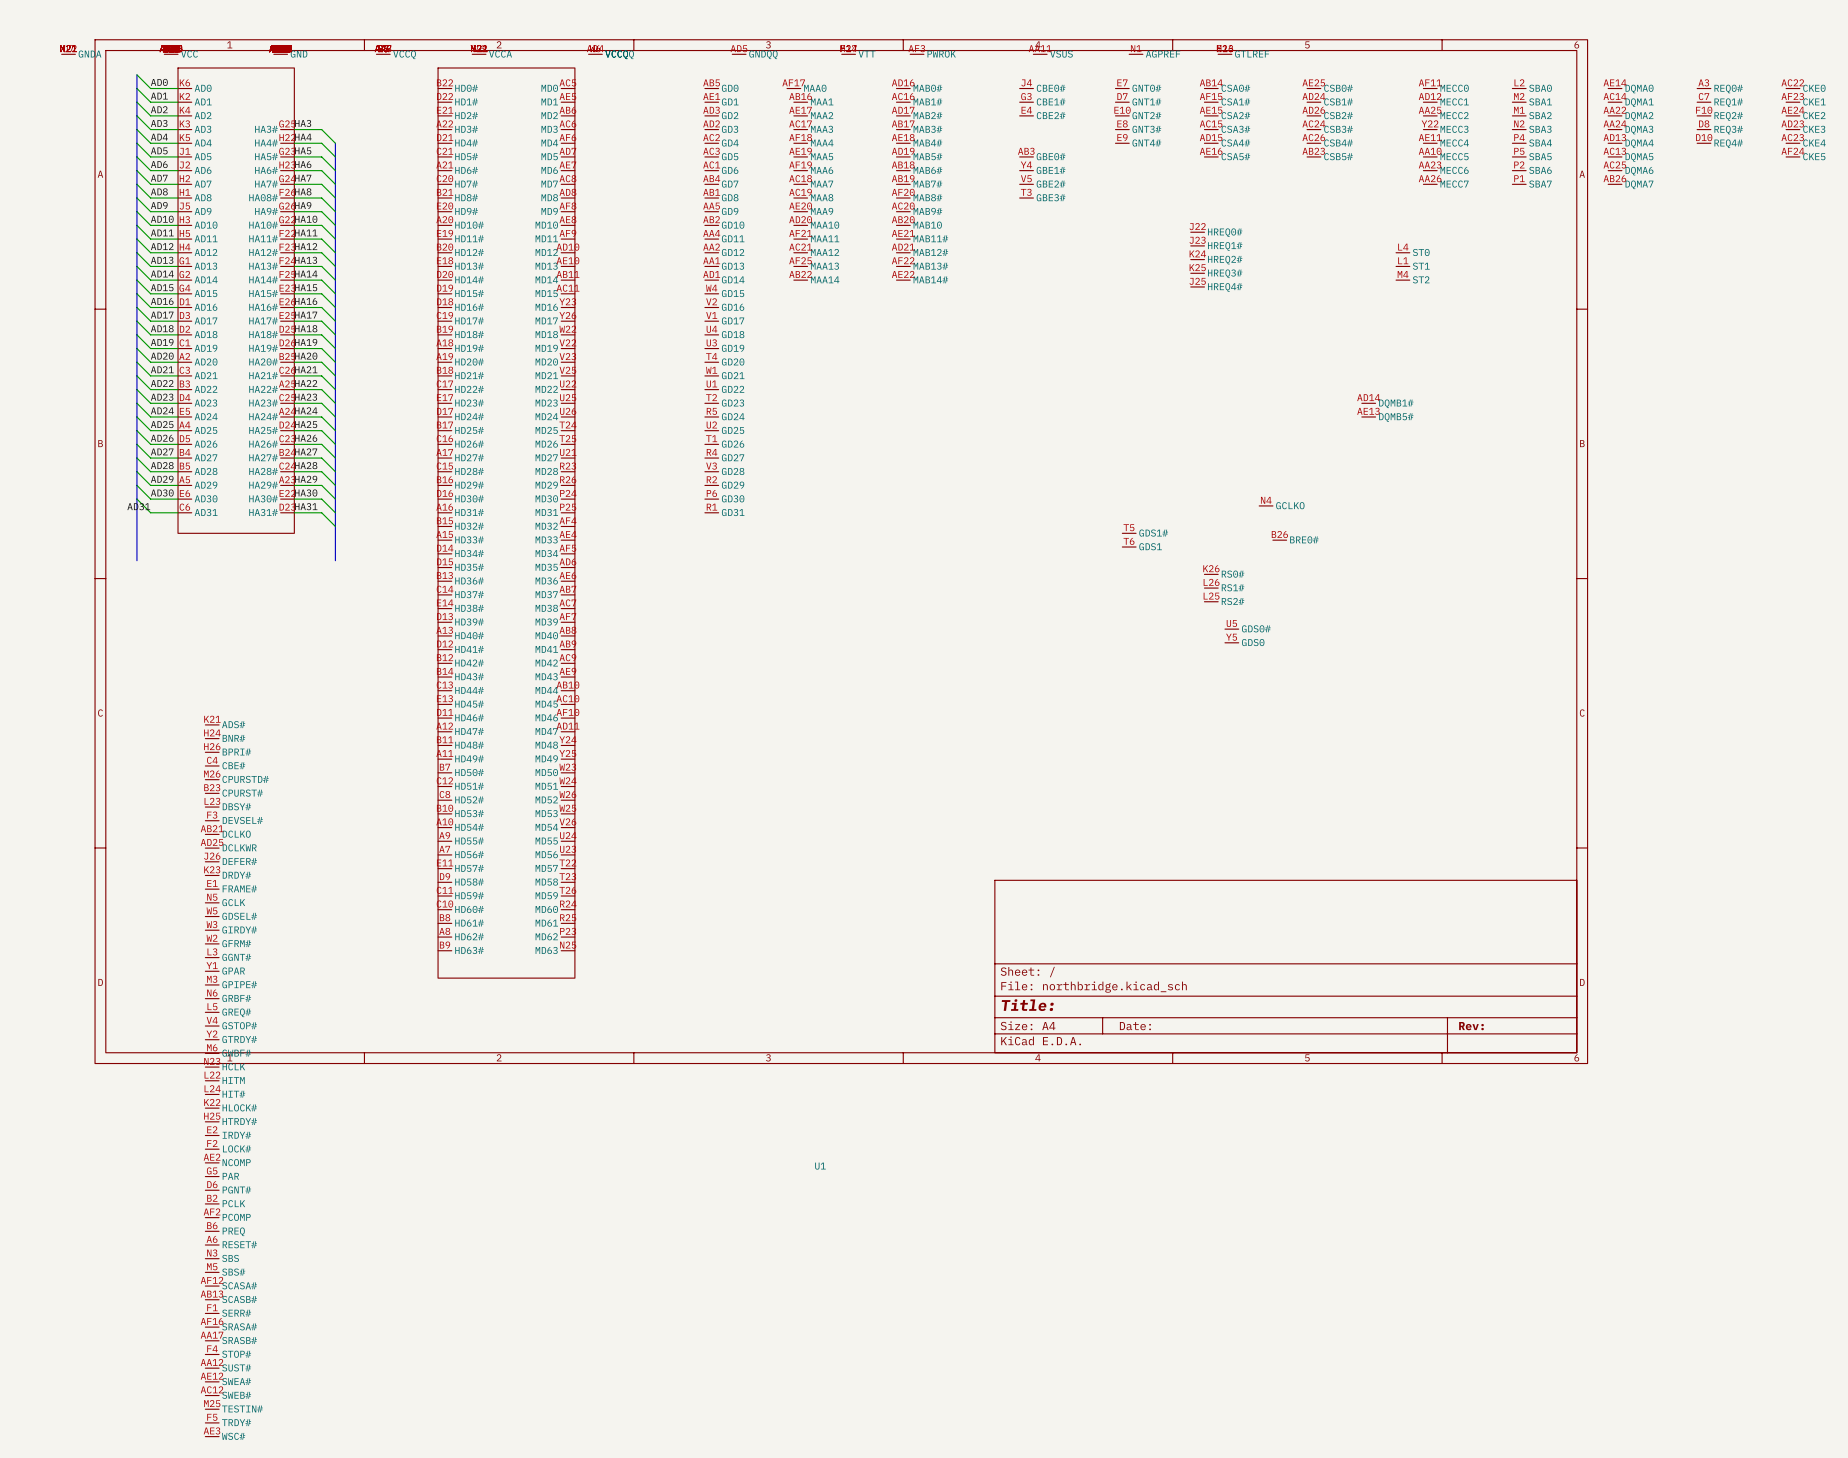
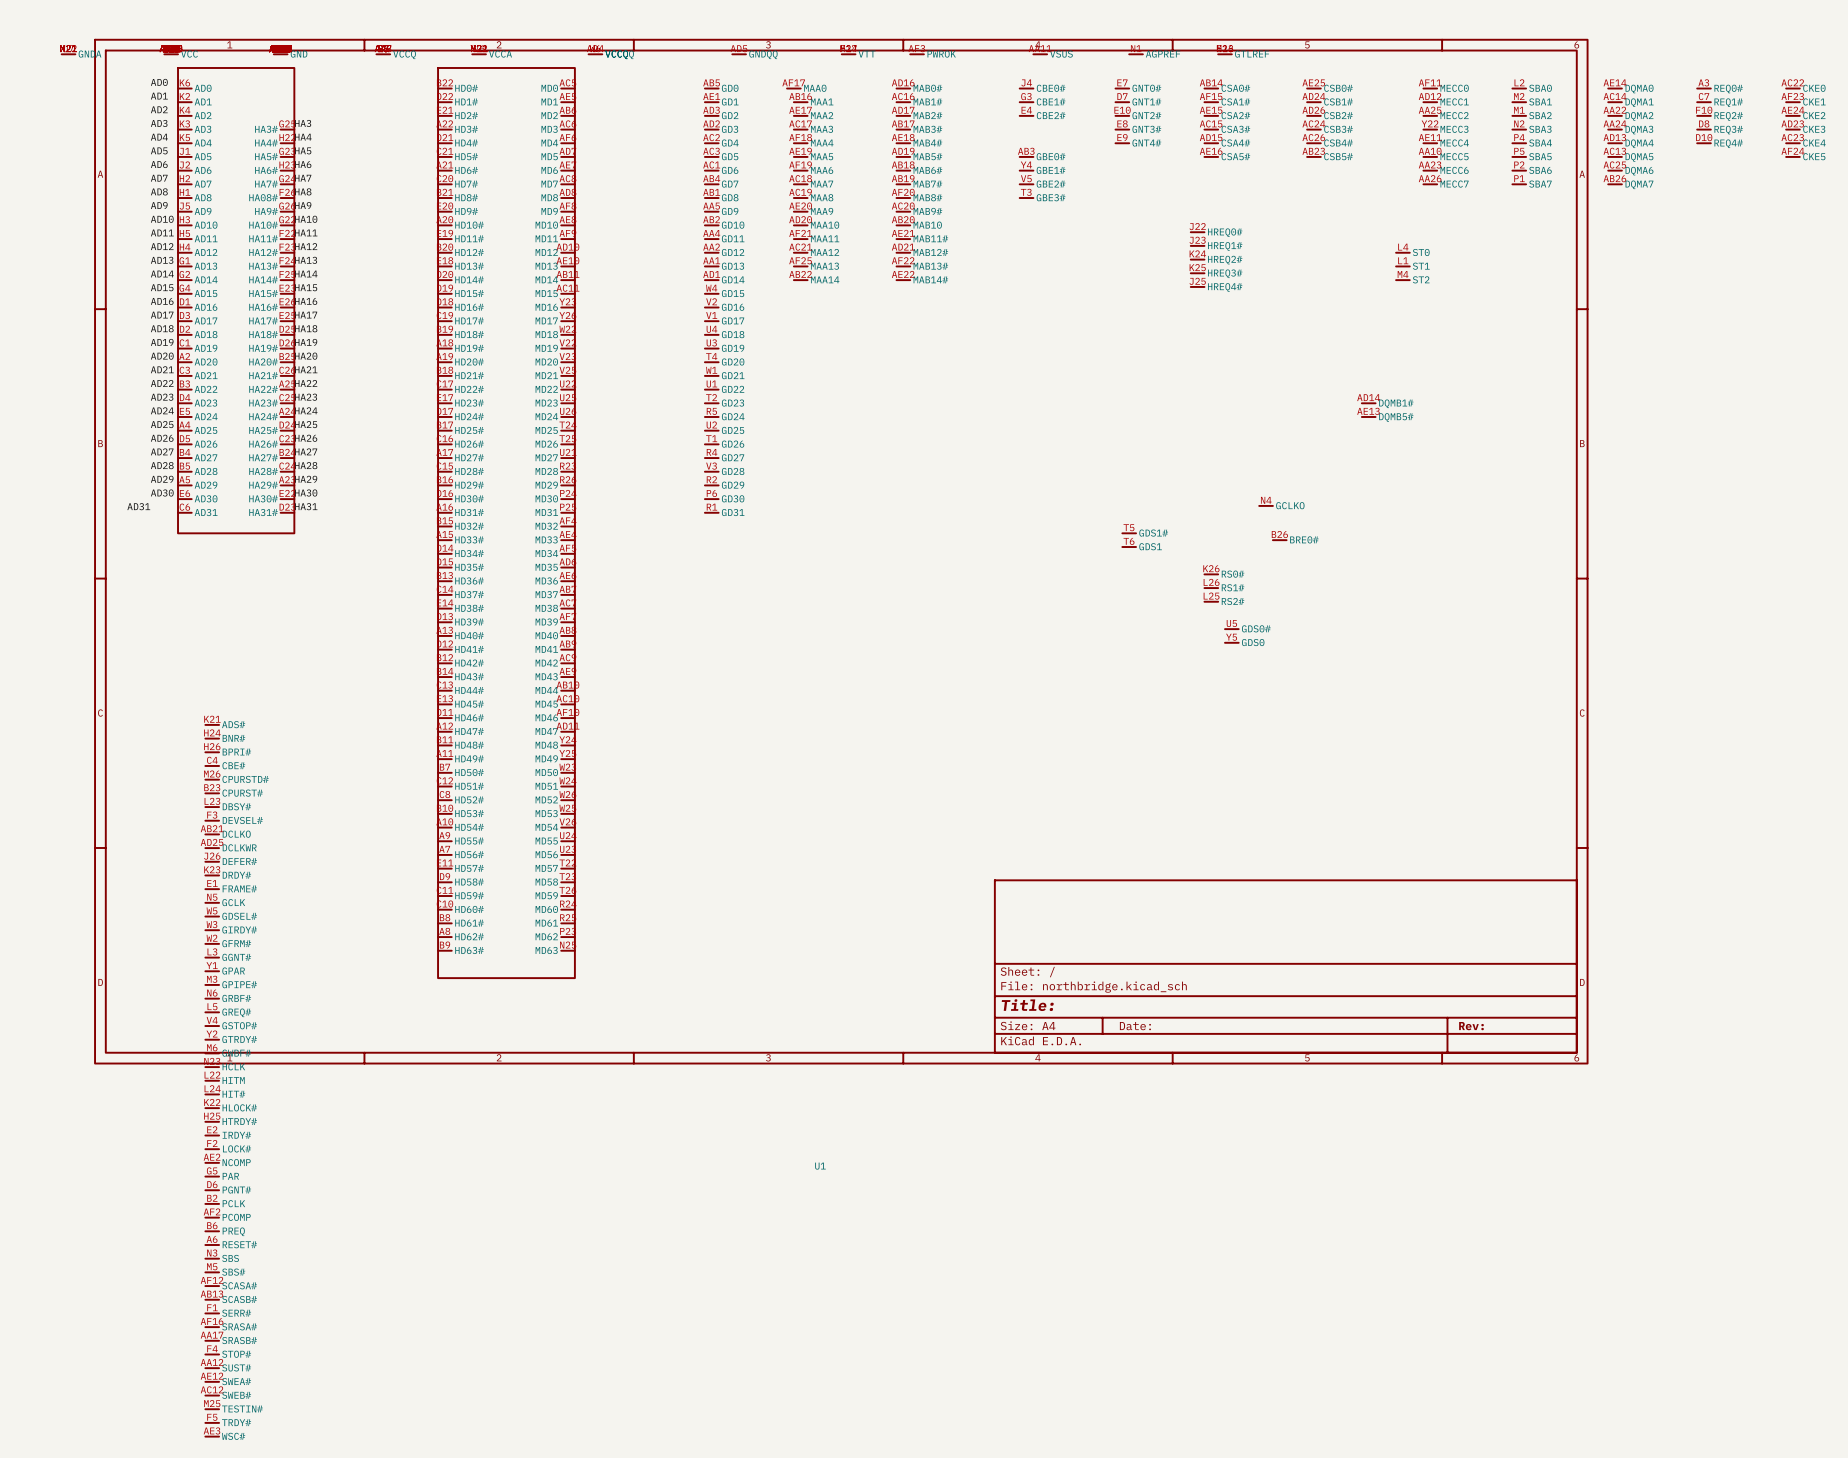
wire: (136, 74) (150, 88) (178, 88) -> none
bus: (136, 74) (136, 560) -> none
wire: (136, 88) (150, 102) (178, 102) -> none
wire: (136, 102) (150, 115) (178, 115) -> none
wire: (136, 115) (150, 129) (178, 129) -> none
wire: (136, 129) (150, 143) (178, 143) -> none
wire: (294, 129) (321, 129) (335, 143) -> none
wire: (136, 143) (150, 156) (178, 156) -> none
wire: (294, 143) (321, 143) (335, 156) -> none
bus: (335, 143) (335, 560) -> none
wire: (136, 156) (150, 170) (178, 170) -> none
wire: (294, 156) (321, 156) (335, 170) -> none
wire: (136, 170) (150, 184) (178, 184) -> none
wire: (294, 170) (321, 170) (335, 184) -> none
wire: (136, 184) (150, 198) (178, 198) -> none
wire: (294, 184) (321, 184) (335, 198) -> none
wire: (136, 198) (150, 211) (178, 211) -> none
wire: (294, 198) (321, 198) (335, 211) -> none
wire: (136, 211) (150, 225) (178, 225) -> none
wire: (294, 211) (321, 211) (335, 225) -> none
wire: (136, 225) (150, 239) (178, 239) -> none
wire: (294, 225) (321, 225) (335, 239) -> none
wire: (136, 239) (150, 252) (178, 252) -> none
wire: (294, 239) (321, 239) (335, 252) -> none
wire: (136, 252) (150, 266) (178, 266) -> none
wire: (294, 252) (321, 252) (335, 266) -> none
wire: (136, 266) (150, 280) (178, 280) -> none
wire: (294, 266) (321, 266) (335, 280) -> none
wire: (136, 280) (150, 293) (178, 293) -> none
wire: (294, 280) (321, 280) (335, 293) -> none
wire: (136, 293) (150, 307) (178, 307) -> none
wire: (294, 293) (321, 293) (335, 307) -> none
wire: (136, 307) (150, 321) (178, 321) -> none
wire: (294, 307) (321, 307) (335, 321) -> none
wire: (136, 321) (150, 334) (178, 334) -> none
wire: (294, 321) (321, 321) (335, 334) -> none
wire: (136, 334) (150, 348) (178, 348) -> none
wire: (294, 334) (321, 334) (335, 348) -> none
wire: (136, 348) (150, 362) (178, 362) -> none
wire: (294, 348) (321, 348) (335, 362) -> none
wire: (136, 362) (150, 375) (178, 375) -> none
wire: (294, 362) (321, 362) (335, 375) -> none
wire: (136, 375) (150, 389) (178, 389) -> none
wire: (294, 375) (321, 375) (335, 389) -> none
wire: (136, 389) (150, 403) (178, 403) -> none
wire: (294, 389) (321, 389) (335, 403) -> none
wire: (136, 403) (150, 416) (178, 416) -> none
wire: (294, 403) (321, 403) (335, 416) -> none
wire: (136, 416) (150, 430) (178, 430) -> none
wire: (294, 416) (321, 416) (335, 430) -> none
wire: (136, 430) (150, 444) (178, 444) -> none
wire: (294, 430) (321, 430) (335, 444) -> none
wire: (136, 444) (150, 458) (178, 458) -> none
wire: (294, 444) (321, 444) (335, 458) -> none
wire: (136, 458) (150, 471) (178, 471) -> none
wire: (294, 458) (321, 458) (335, 471) -> none
wire: (136, 471) (150, 485) (178, 485) -> none
wire: (294, 471) (321, 471) (335, 485) -> none
wire: (136, 485) (150, 499) (178, 499) -> none
wire: (294, 485) (321, 485) (335, 499) -> none
wire: (136, 499) (150, 512) (178, 512) -> none
wire: (294, 499) (321, 499) (335, 512) -> none
wire: (294, 512) (321, 512) (335, 526) -> none

